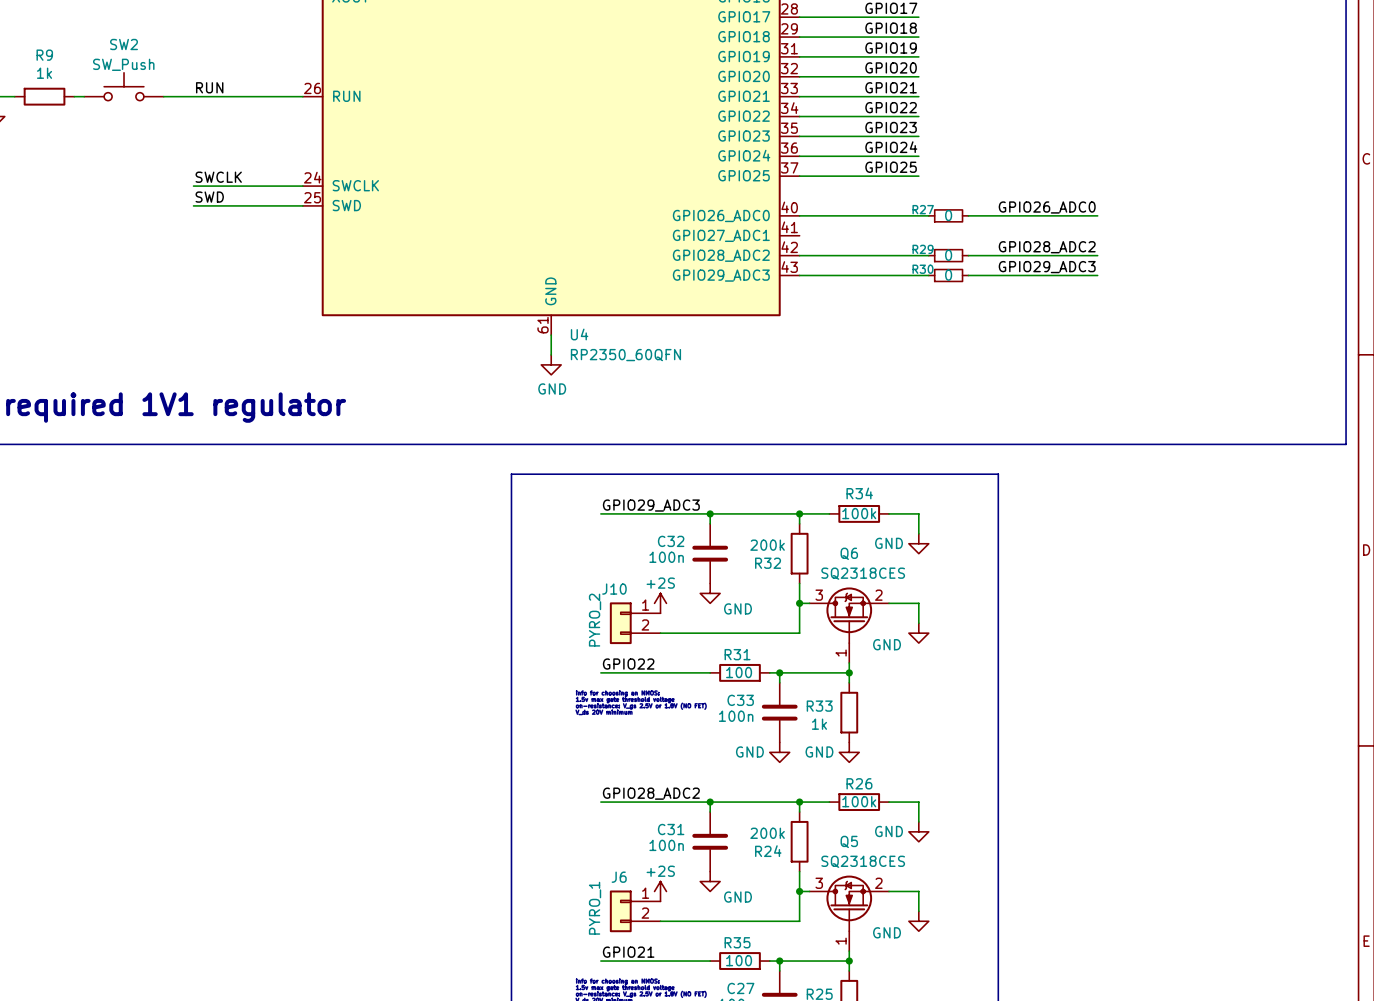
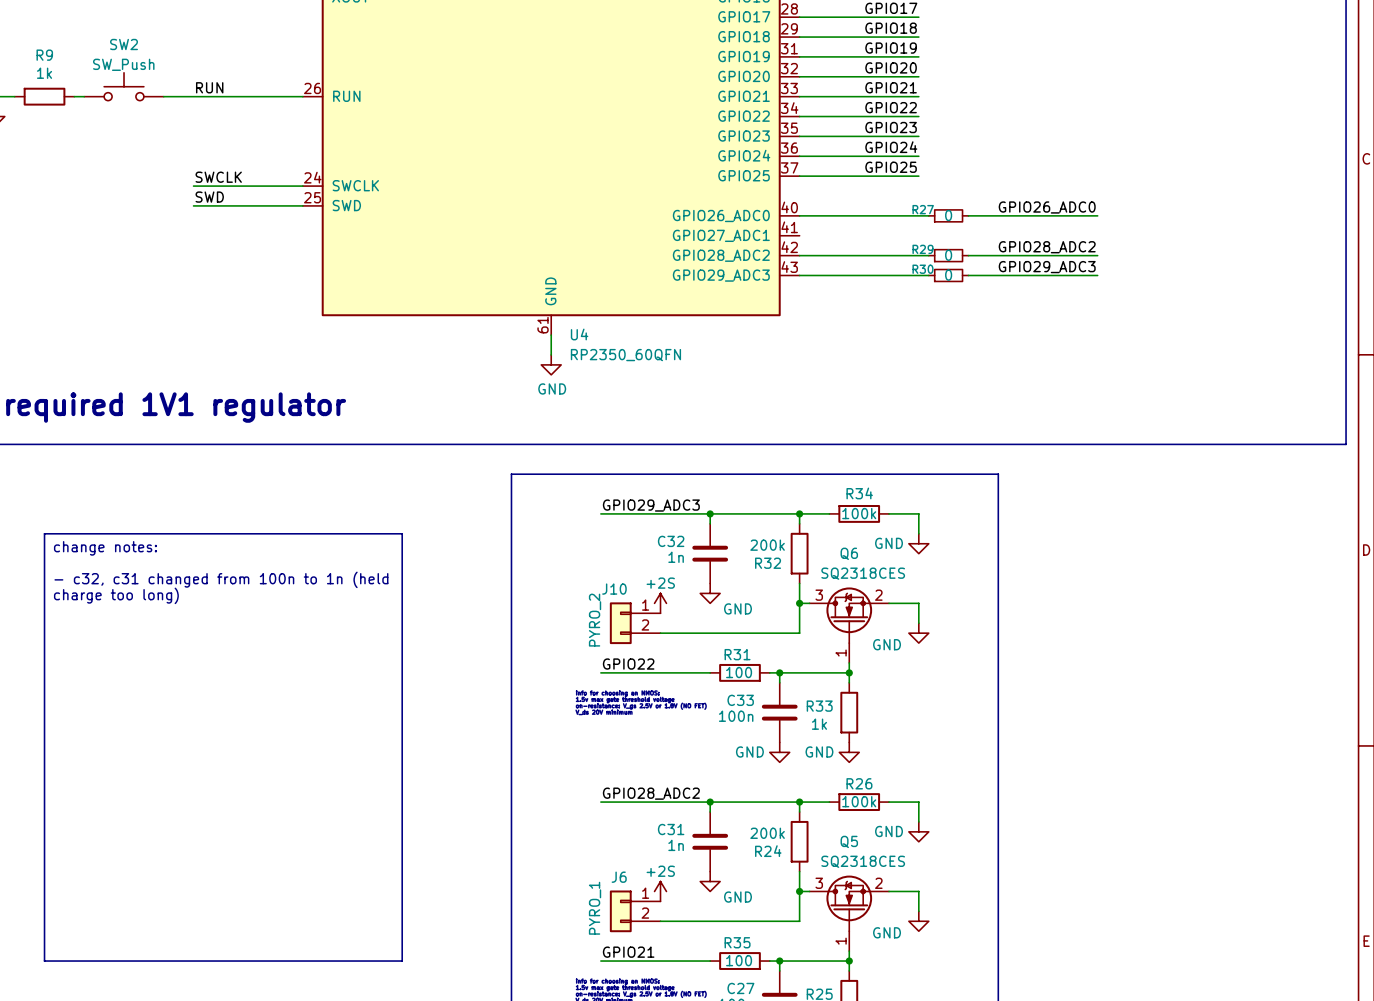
line: none -> (44, 533) (402, 533) (402, 961) (44, 961) (44, 533)
text: none -> change notes: (105, 548)
C32 value: 100n (666, 557) -> 1n (676, 557)
text: none -> - c32, c31 changed from 100n to 1n (held (221, 579)
text: none -> charge too long) (116, 595)
C31 value: 100n (666, 845) -> 1n (676, 845)

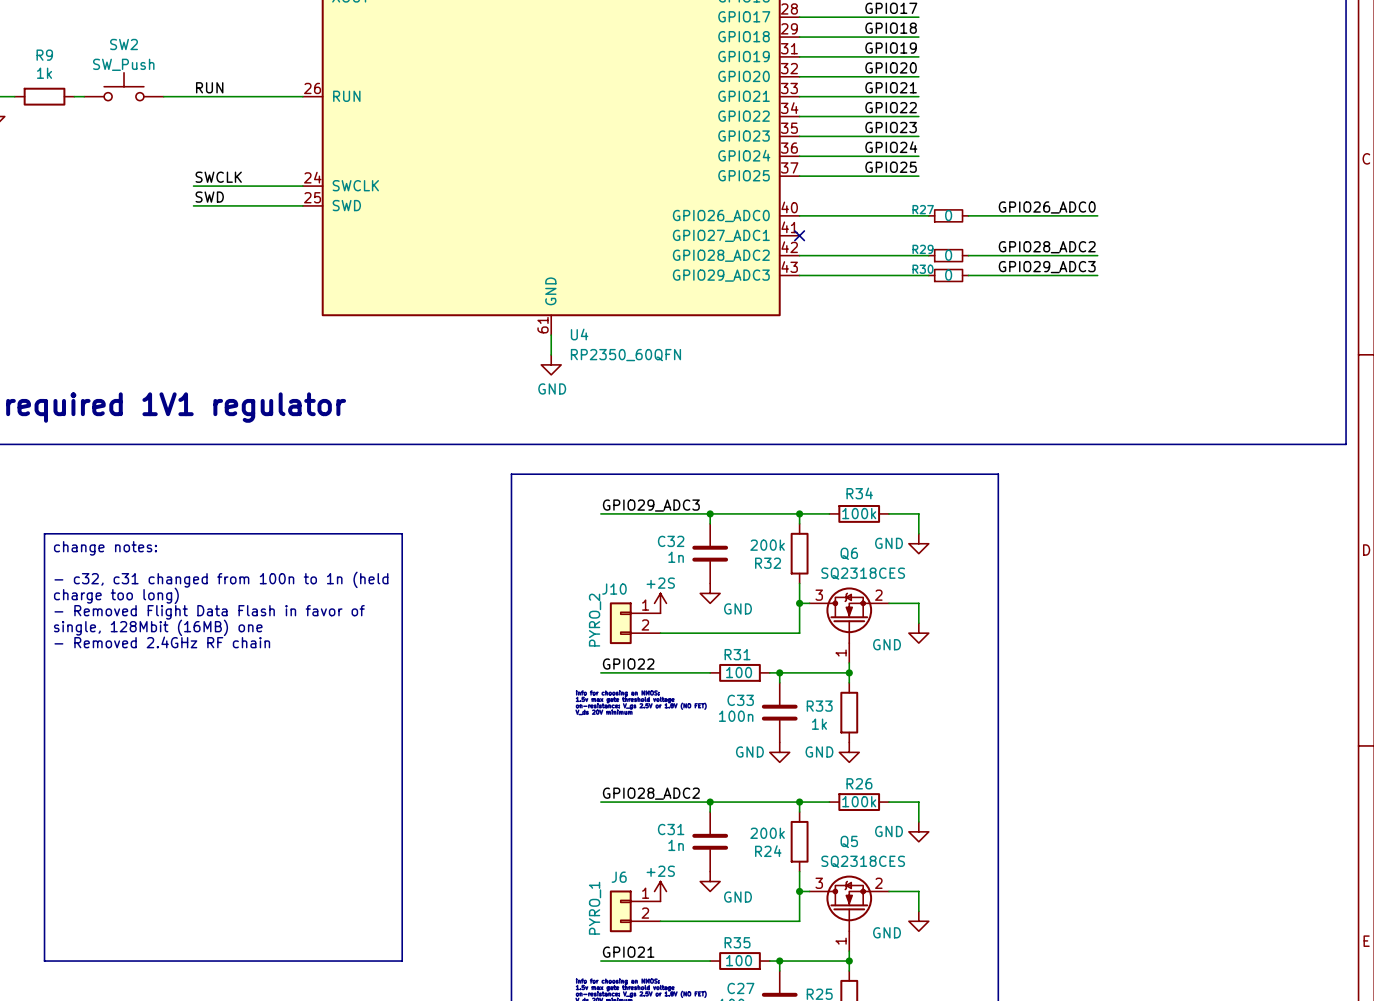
no-connect mark: none -> (799, 235)
text: none -> - Removed Flight Data Flash in favor of (209, 612)
text: none -> single, 128Mbit (16MB) one (158, 627)
text: none -> - Removed 2.4GHz RF chain (162, 642)

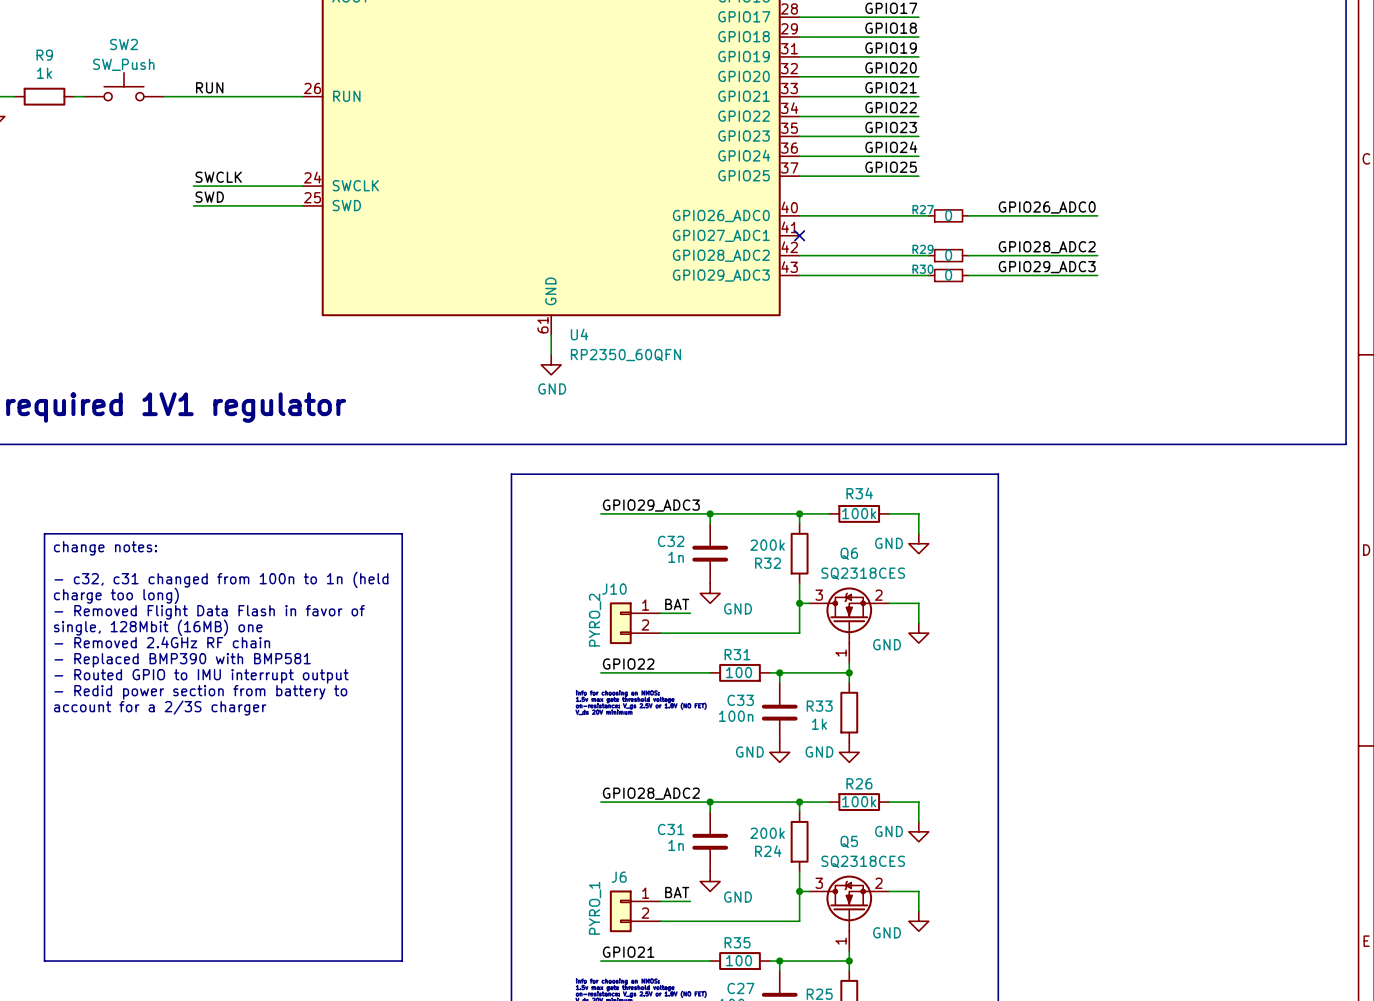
power symbol: +2S (660, 603) -> none
label: none -> BAT (677, 604)
wire: none -> (660, 613) (690, 613)
text: none -> - Replaced BMP390 with BMP581 (182, 660)
text: none -> - Routed GPIO to IMU interrupt output (201, 676)
text: none -> - Redid power section from battery to (200, 692)
text: none -> account for a 2/3S charger (160, 708)
power symbol: +2S (660, 891) -> none
label: none -> BAT (677, 892)
wire: none -> (660, 901) (690, 901)

